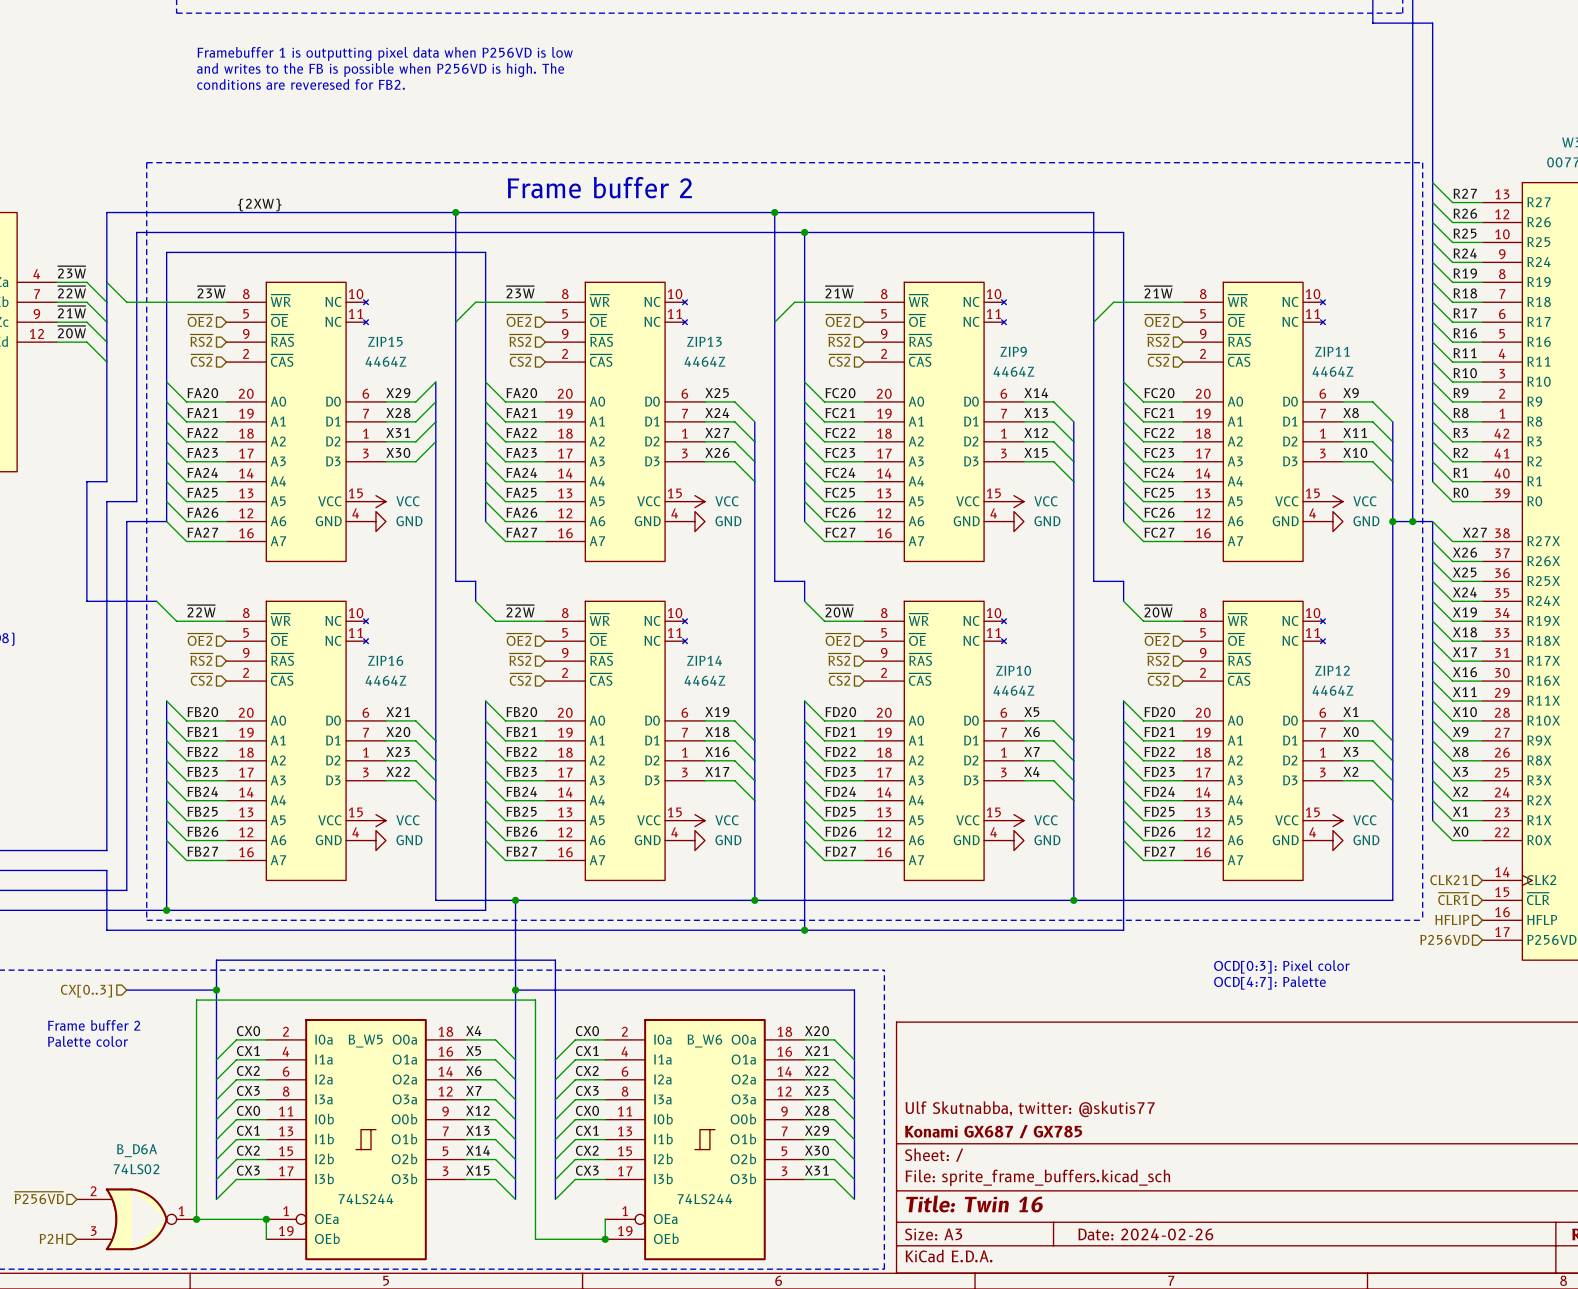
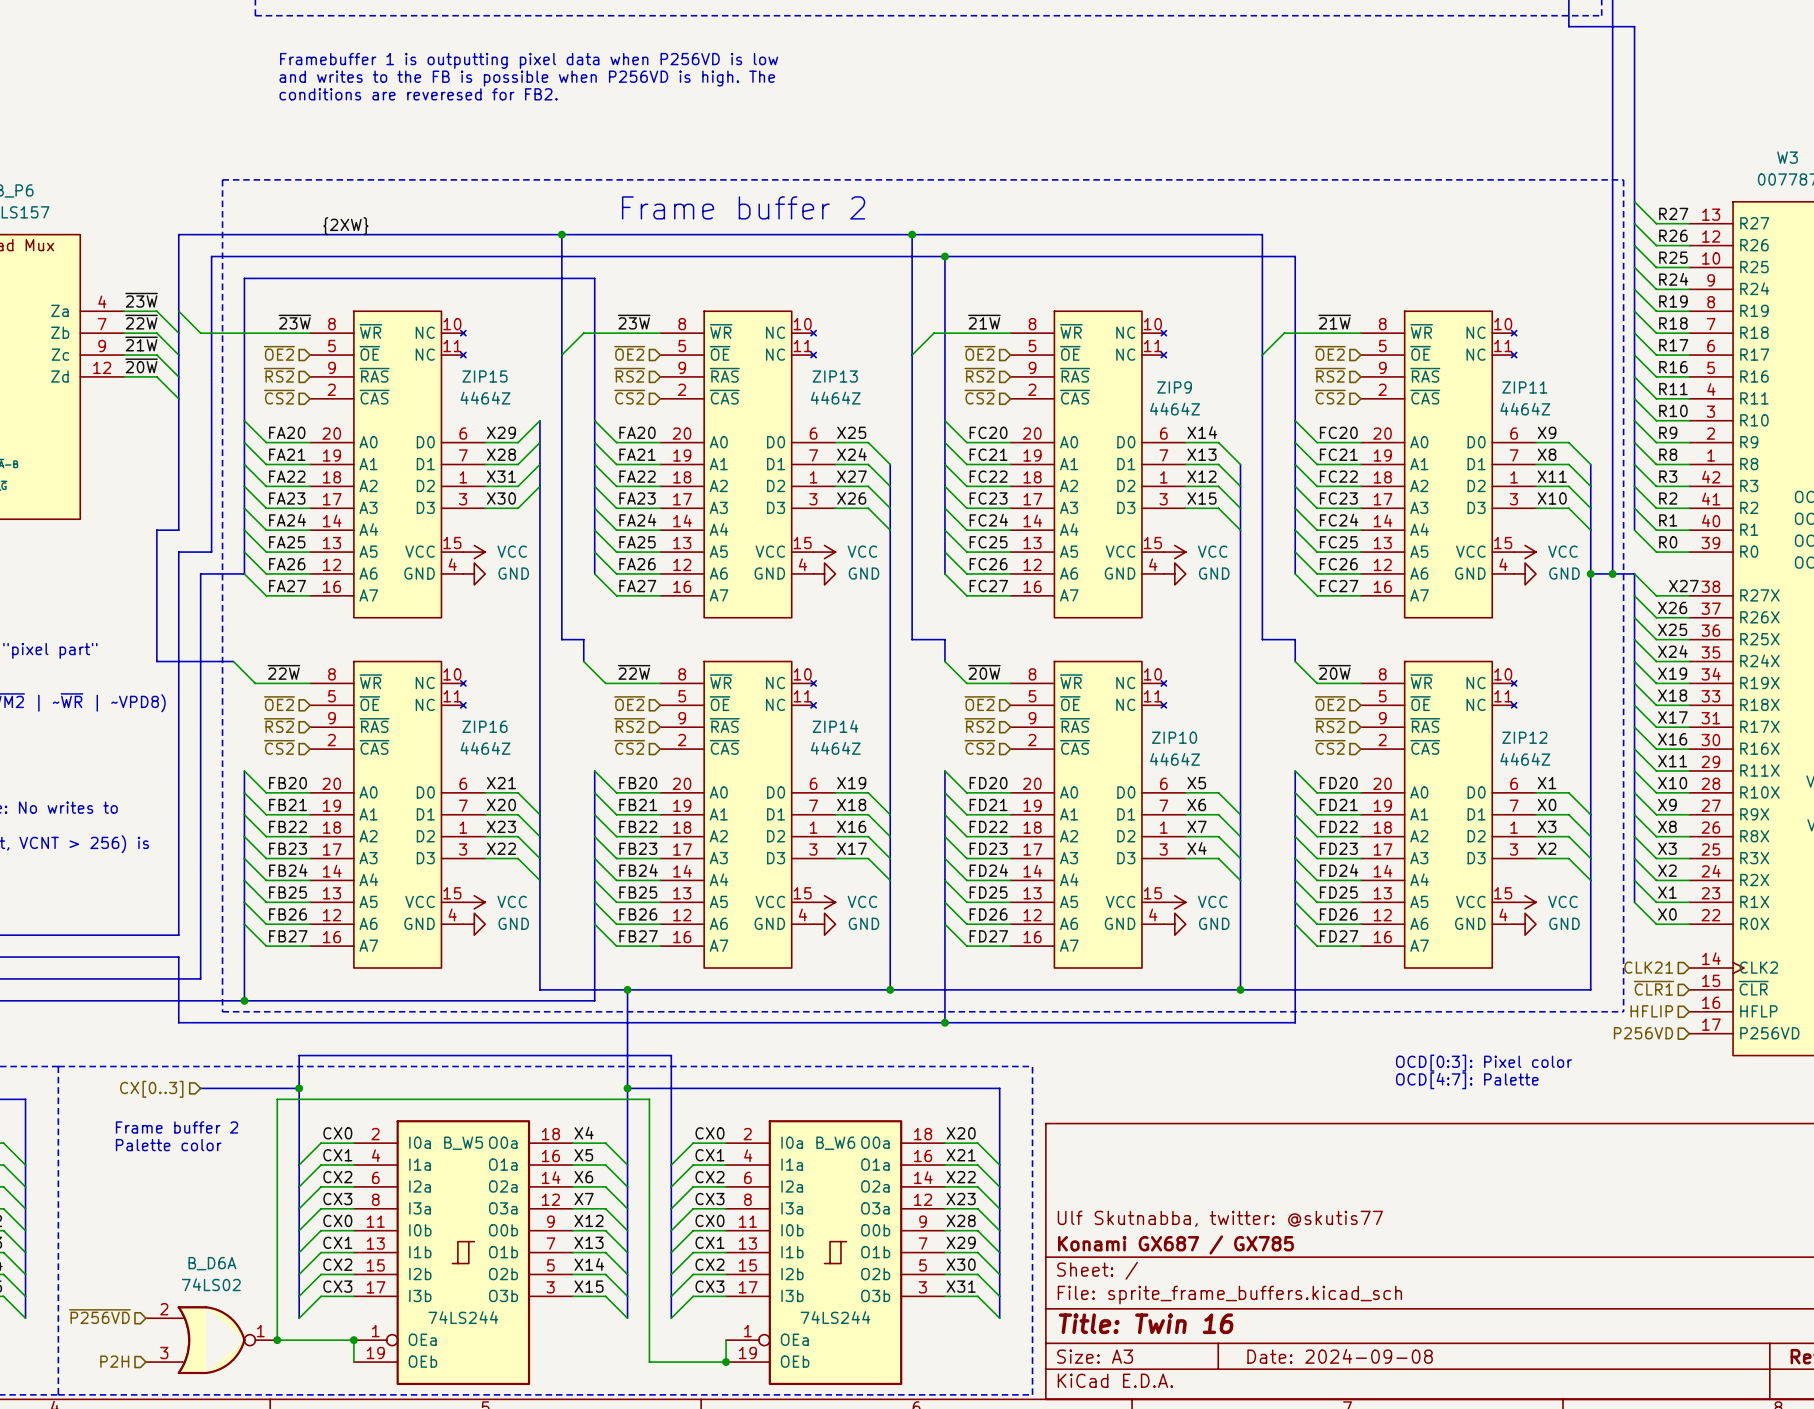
title block: Date: 2024-02-26 (1145, 1234) -> Date: 2024-09-08 (1340, 1356)

